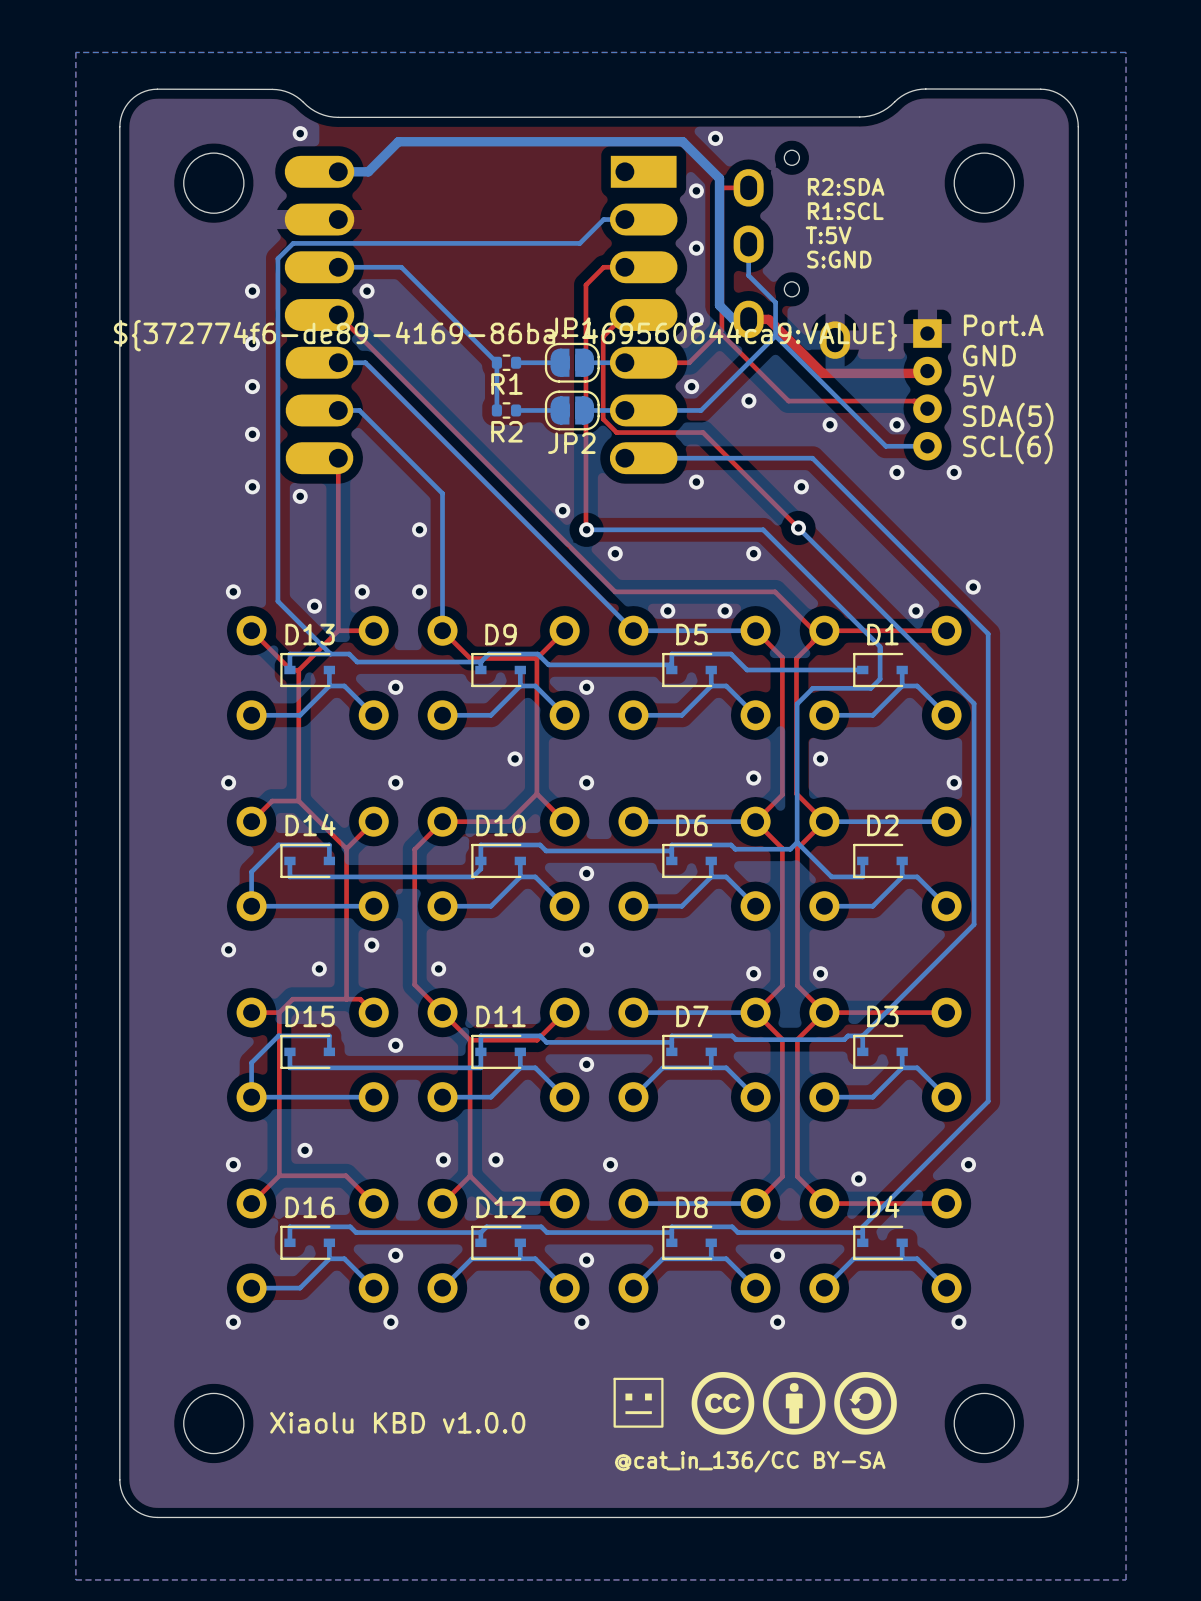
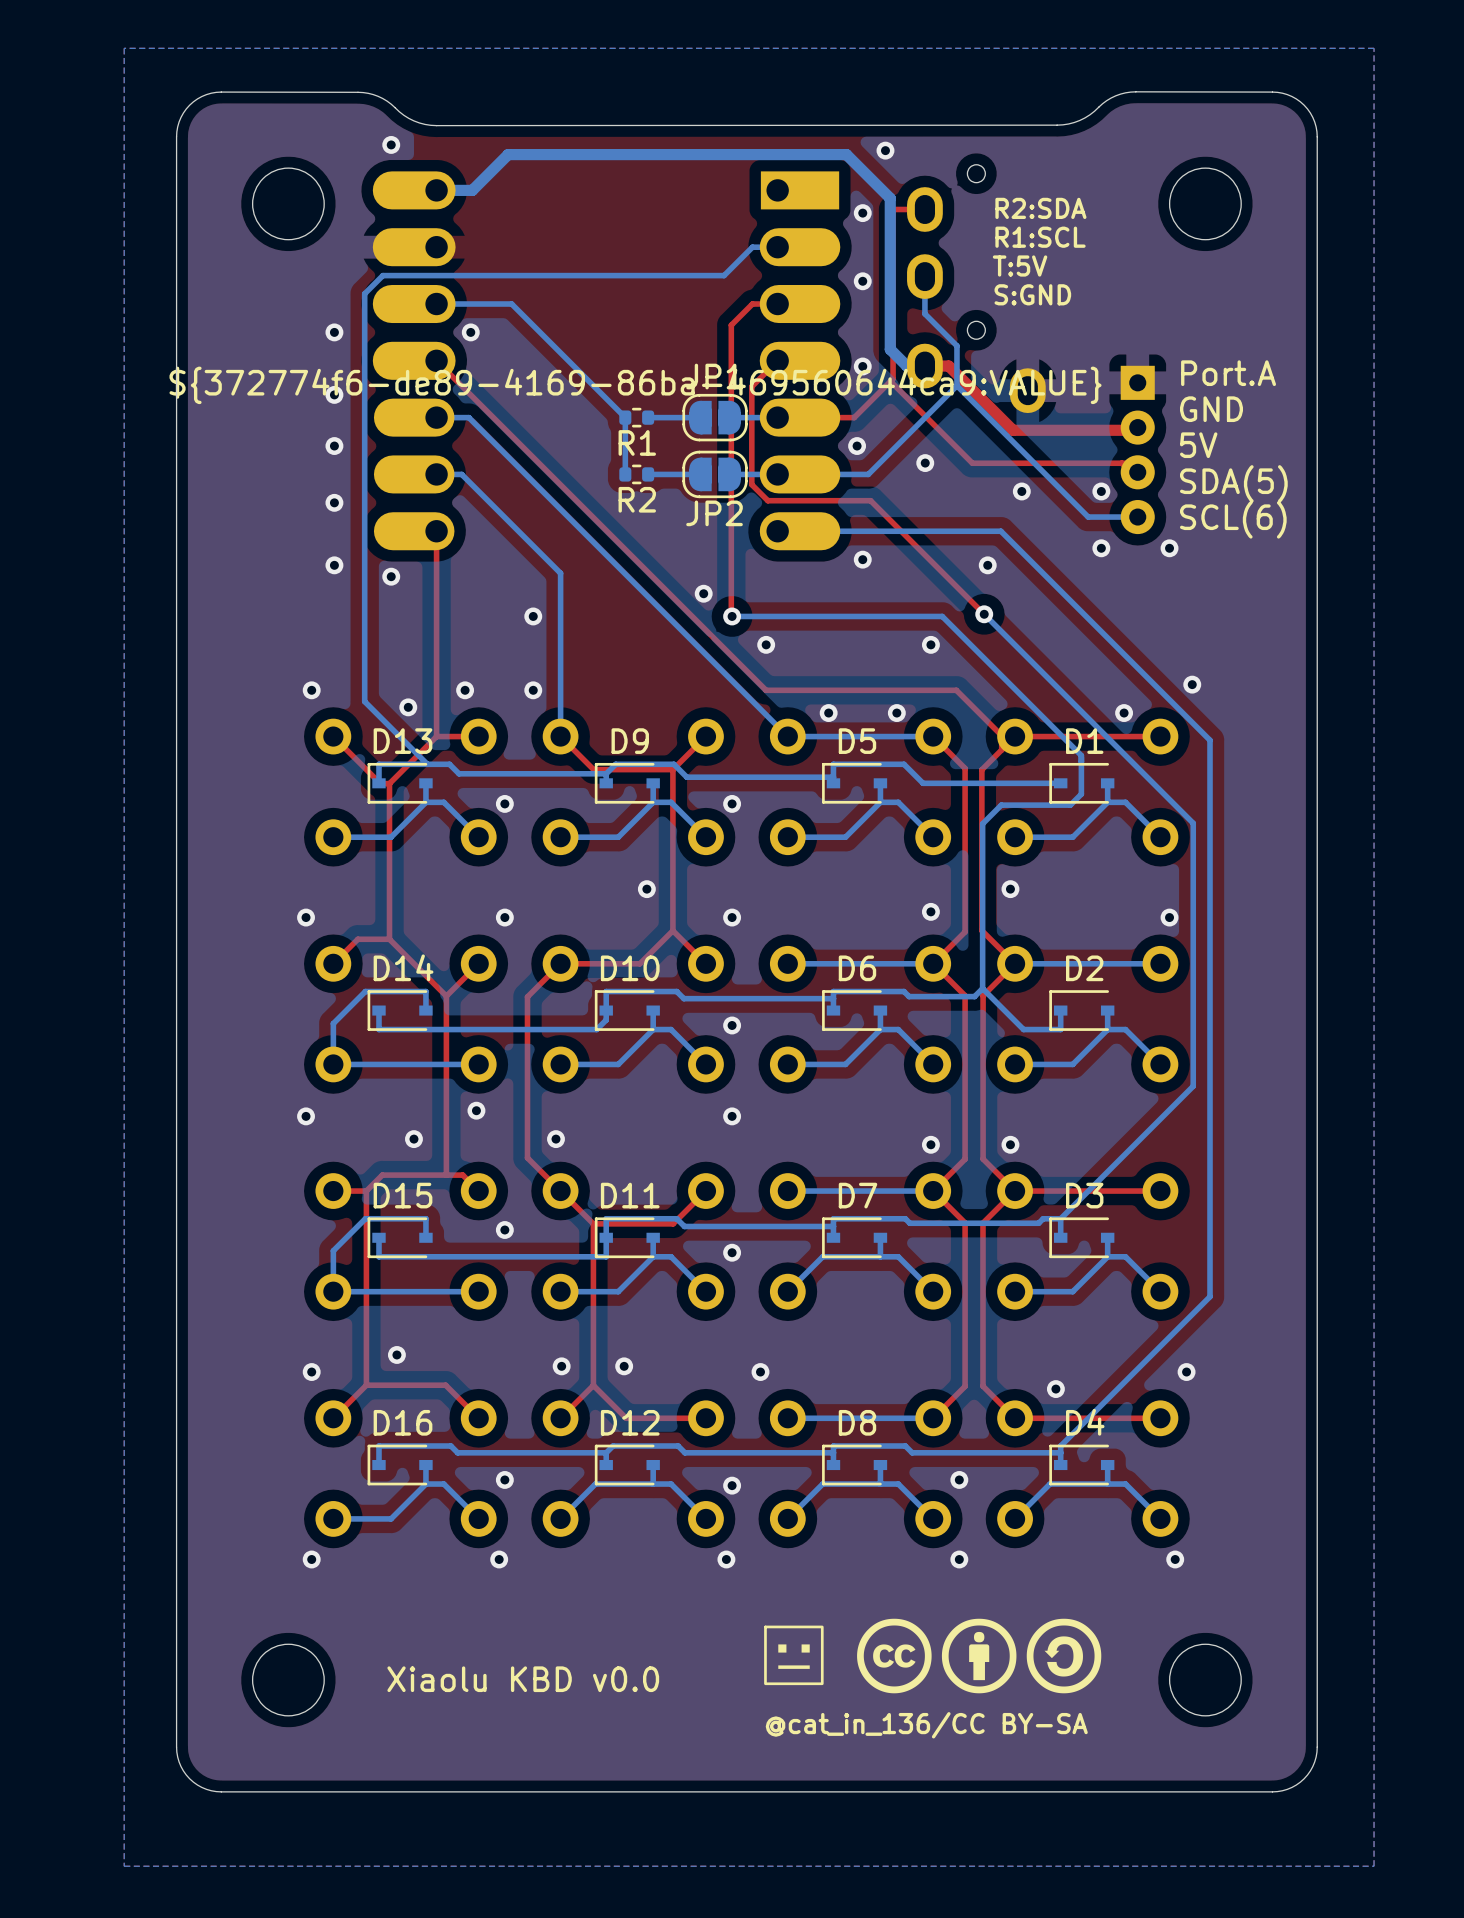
text: Xiaolu KBD v1.0.0 (397, 1422) -> Xiaolu KBD v0.0 (523, 1679)

